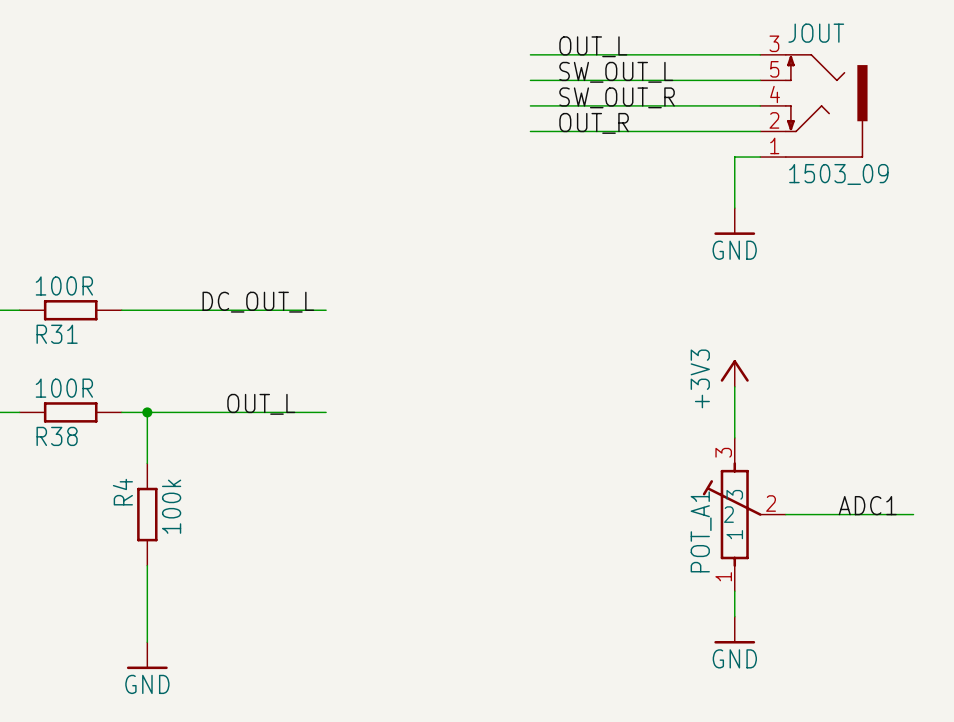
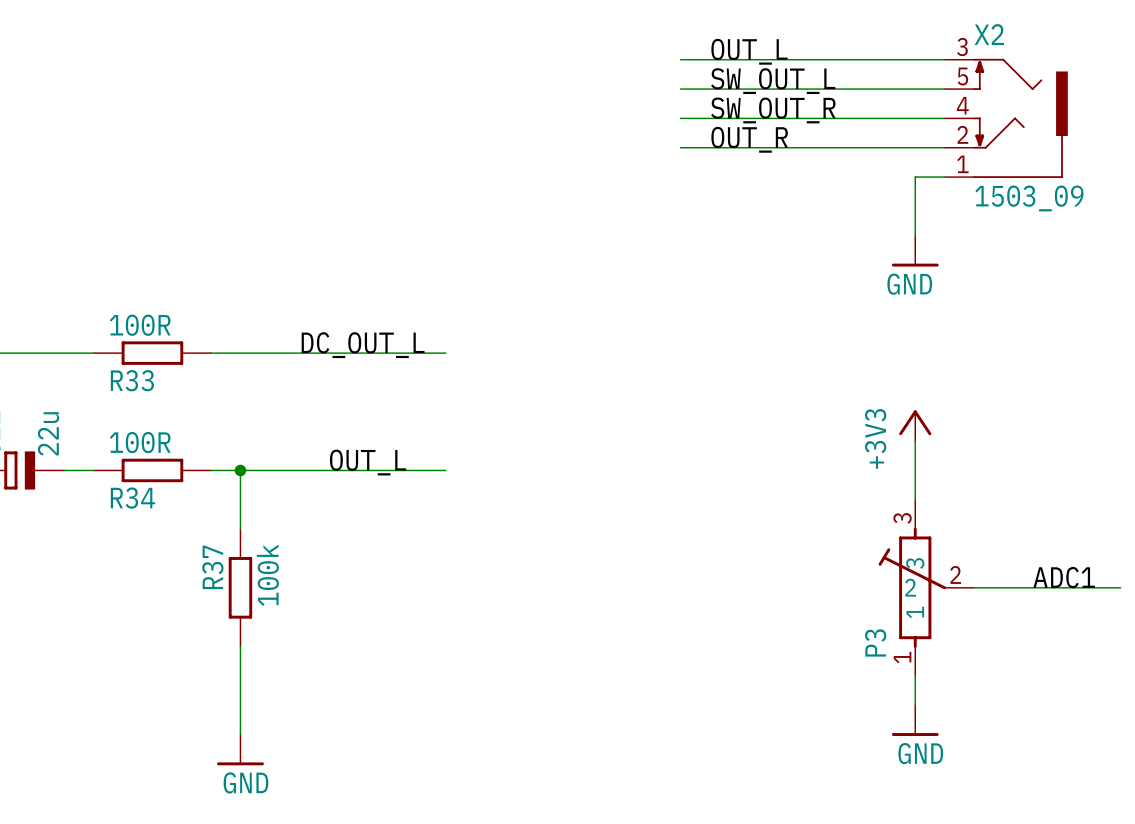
JOUT name: JOUT (816, 33) -> X2 (989, 34)
R31 name: R31 (57, 334) -> R33 (132, 380)
R38 name: R38 (57, 436) -> R34 (132, 498)
R4 name: R4 (122, 492) -> R37 (212, 567)
POT_A1 name: POT_A1 (701, 531) -> P3 (875, 642)

